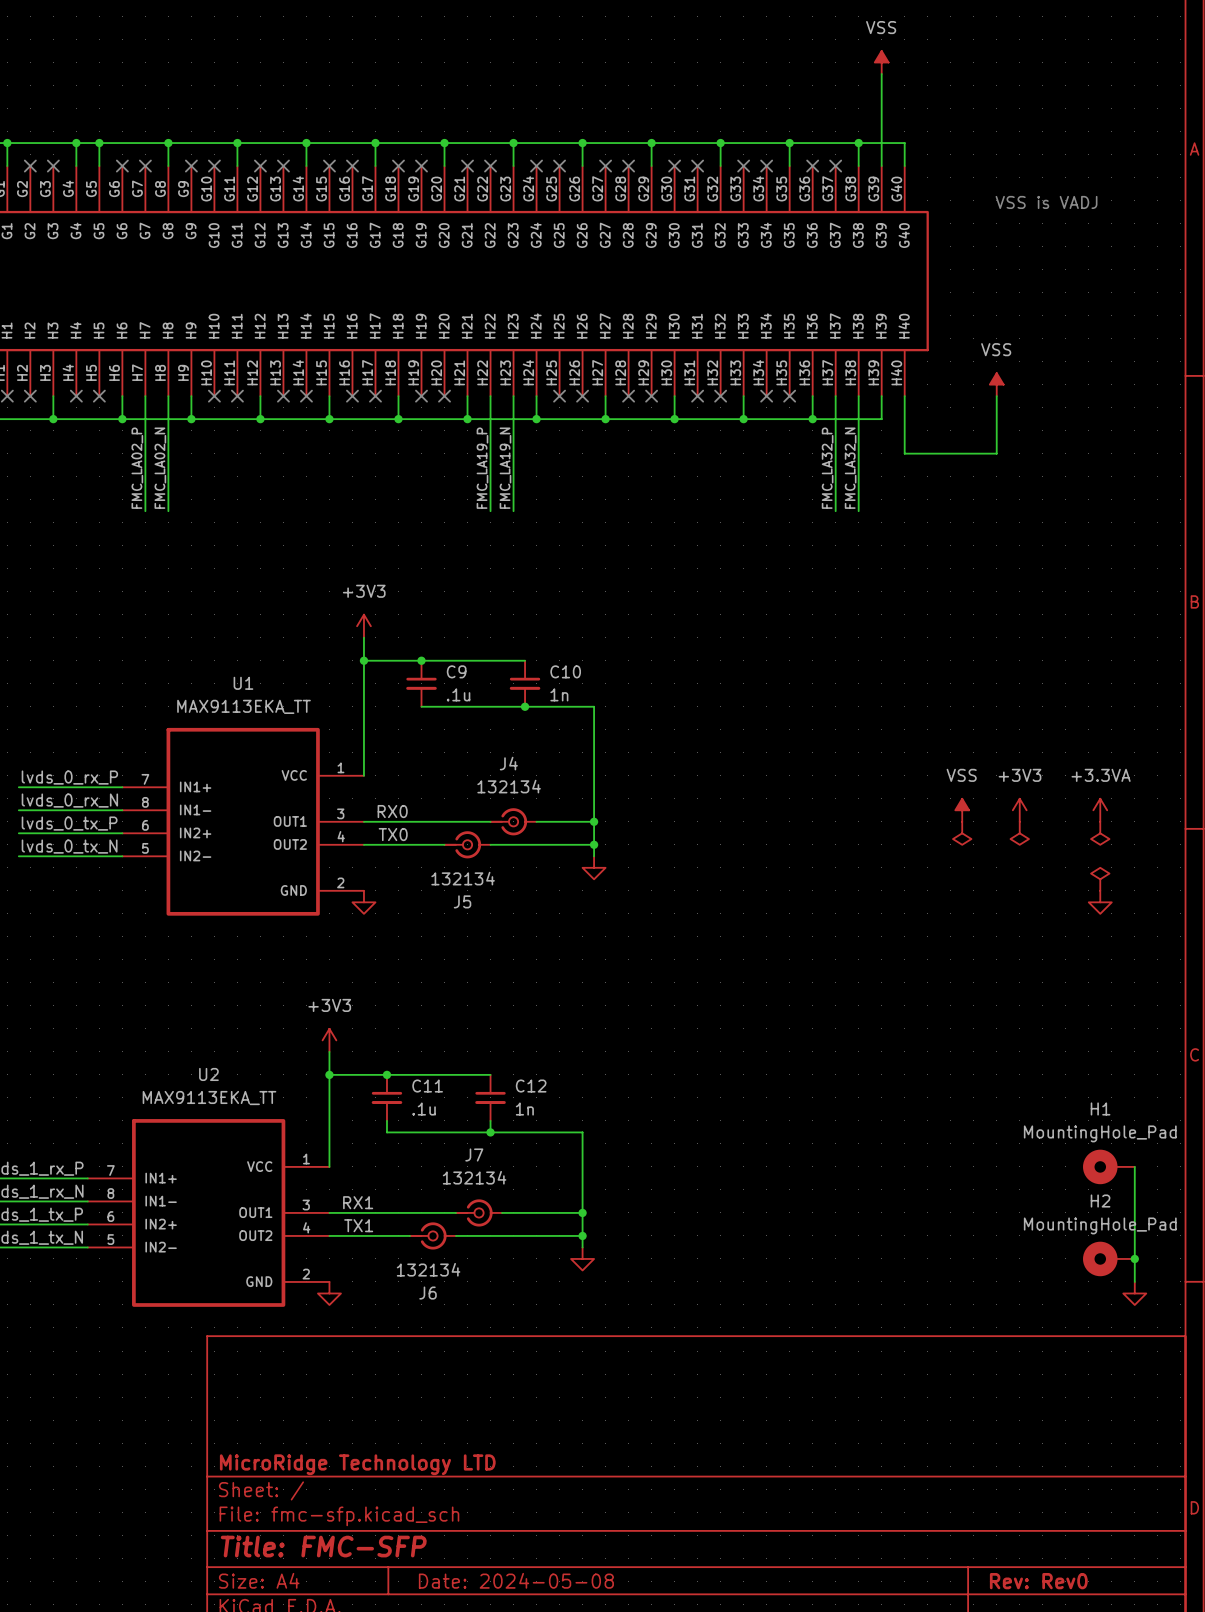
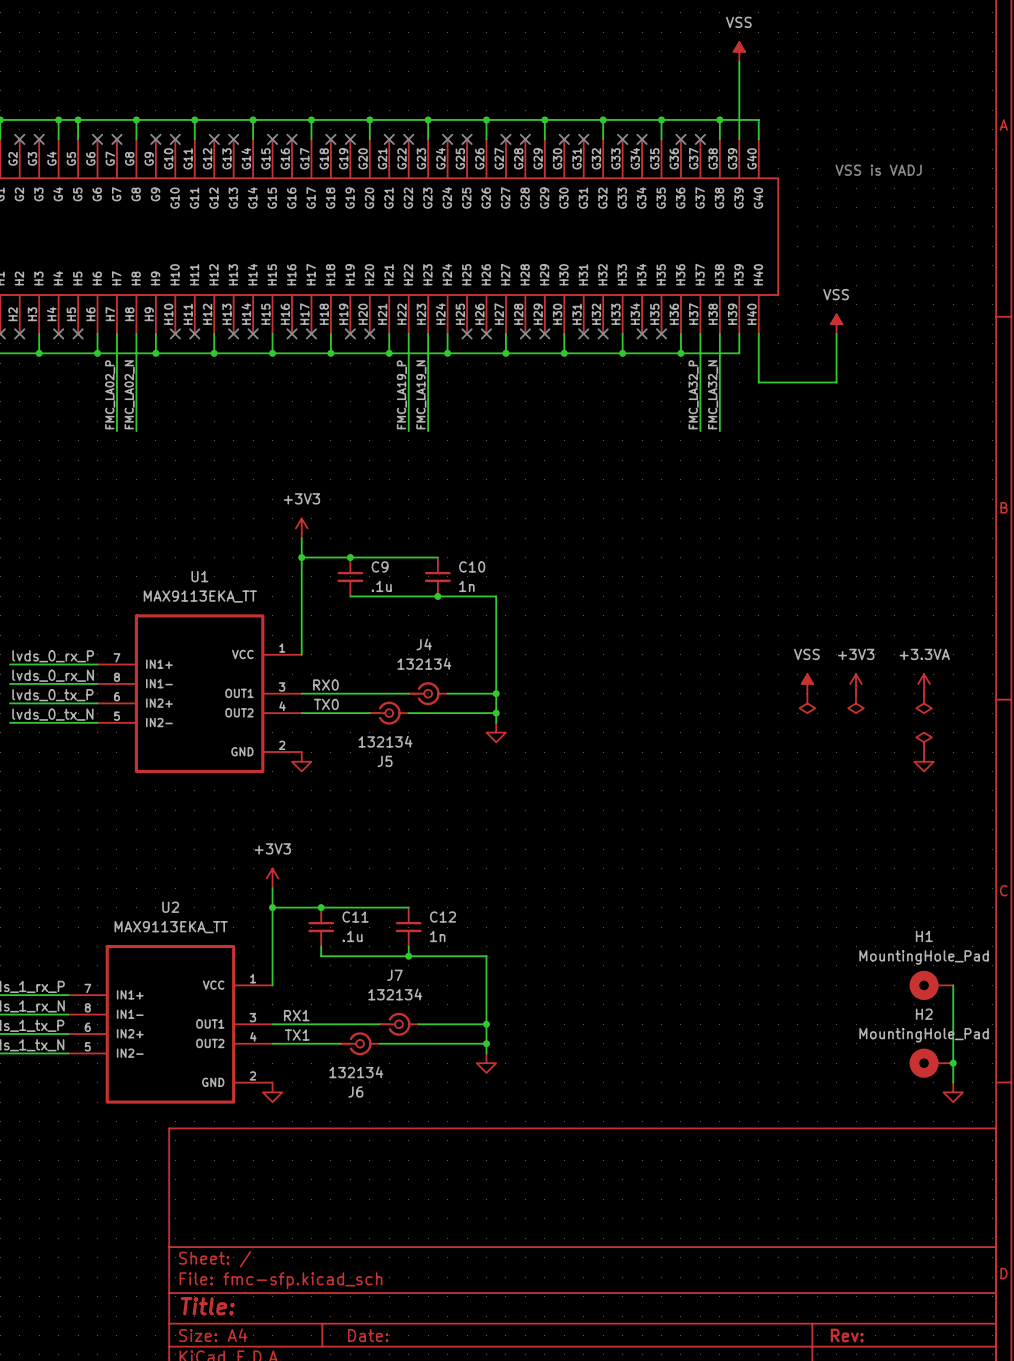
title block: MicroRidge Technology LTD (357, 1464) -> none
title block: Title: FMC-SFP (323, 1546) -> Title: (207, 1306)
title block: Date: 2024-05-08 (516, 1580) -> Date: (368, 1335)
title block: Rev: Rev0 (1038, 1581) -> Rev: (847, 1335)

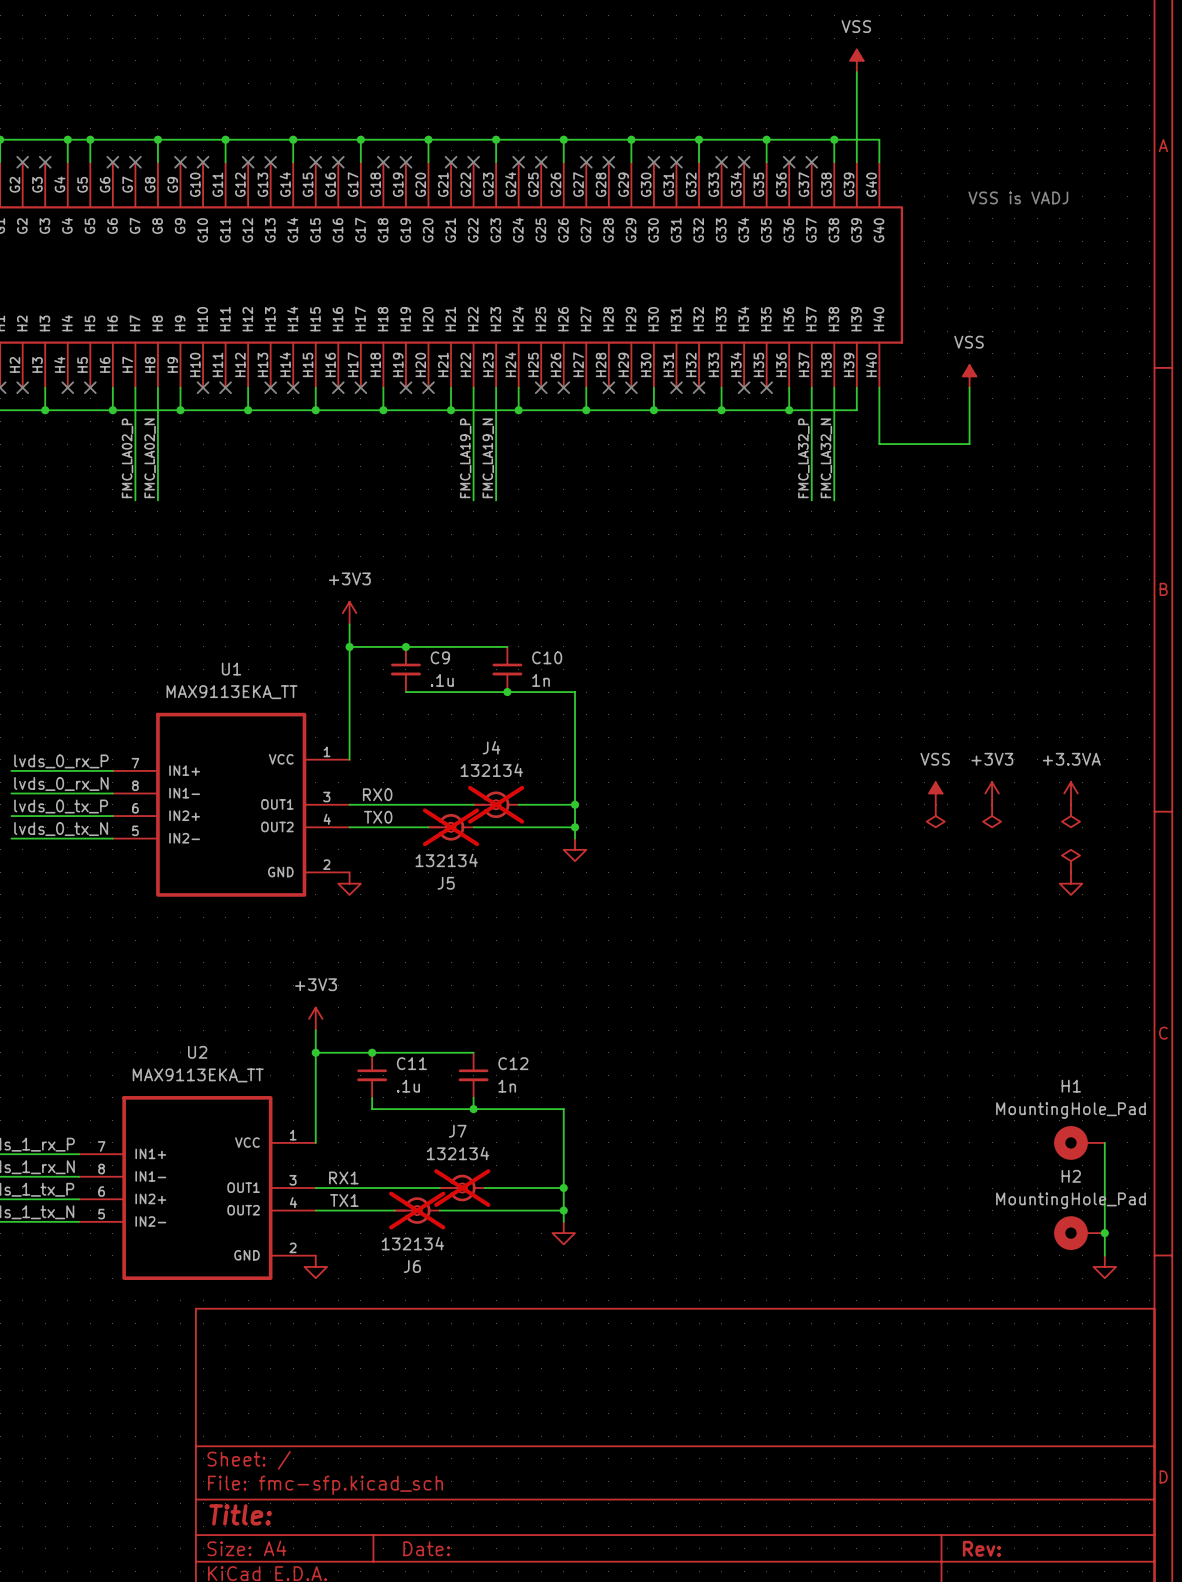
J4 do-not-place cross: none -> (496, 804)
J5 do-not-place cross: none -> (451, 827)
J7 do-not-place cross: none -> (462, 1188)
J6 do-not-place cross: none -> (417, 1210)

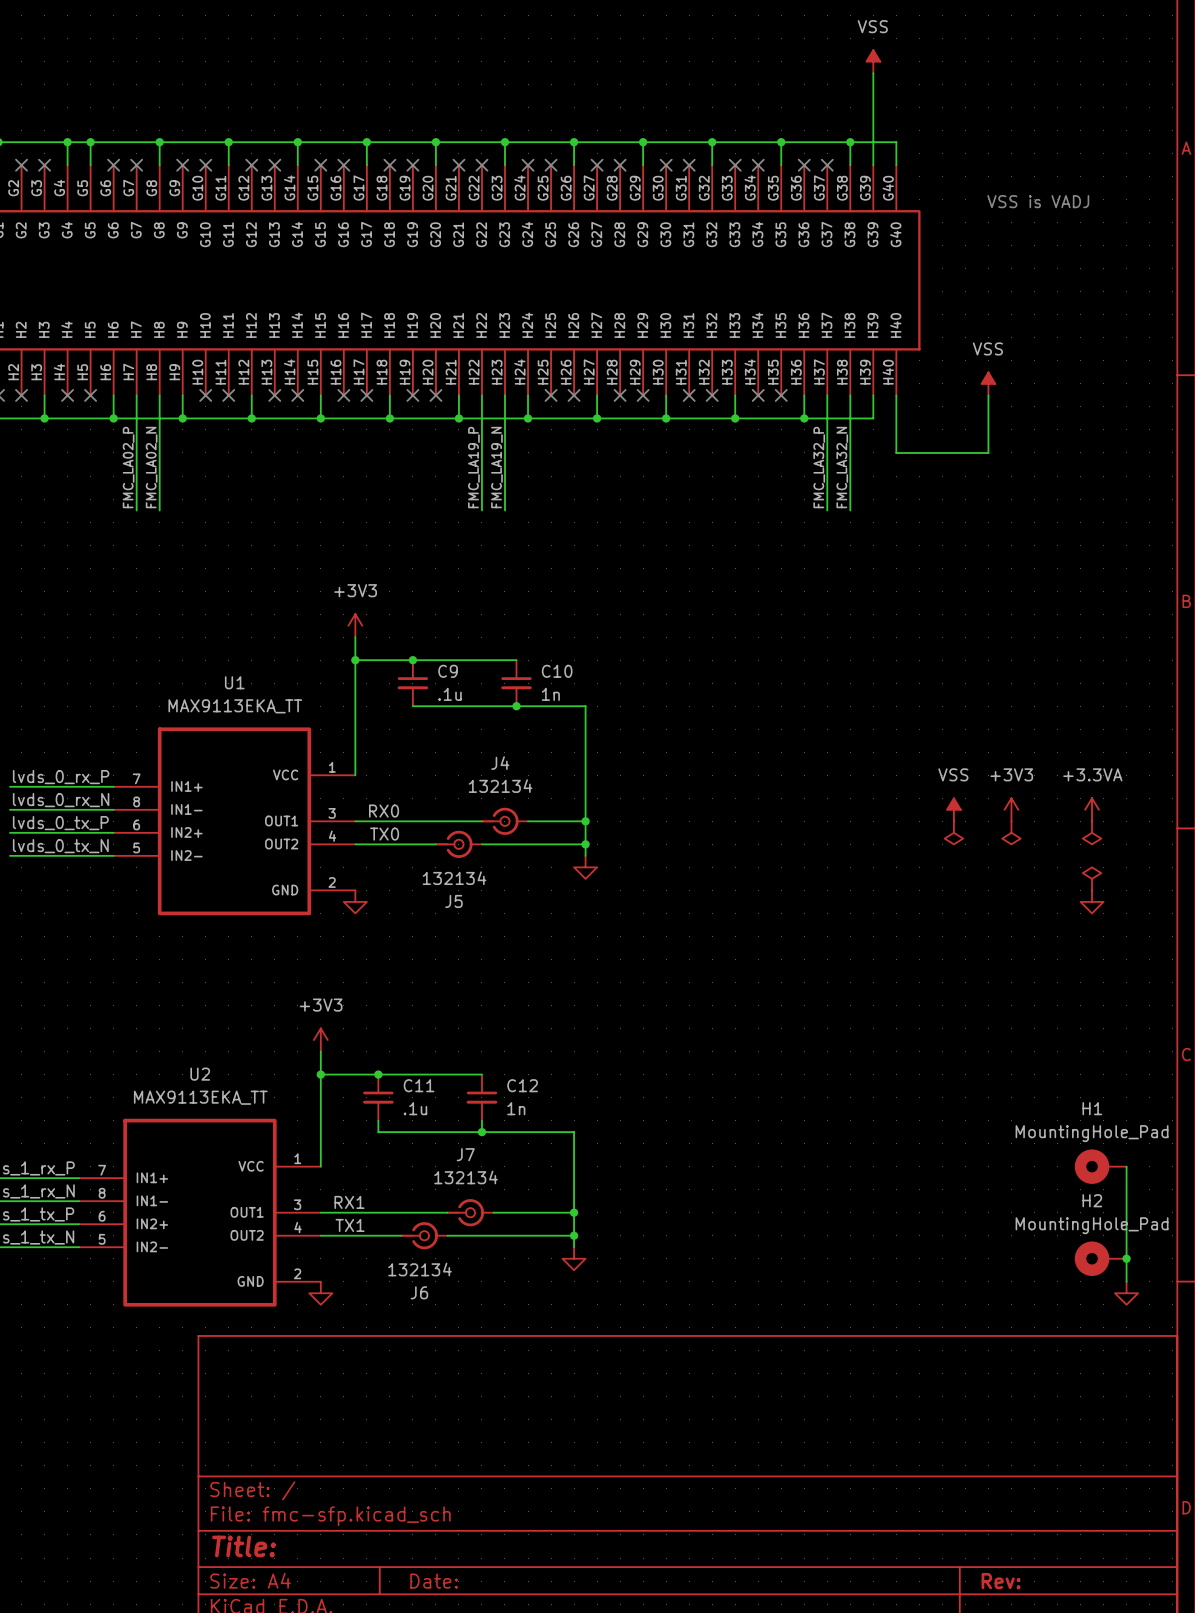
J4 do-not-place cross: (496, 804) -> none
J5 do-not-place cross: (451, 827) -> none
J7 do-not-place cross: (462, 1188) -> none
J6 do-not-place cross: (417, 1210) -> none

